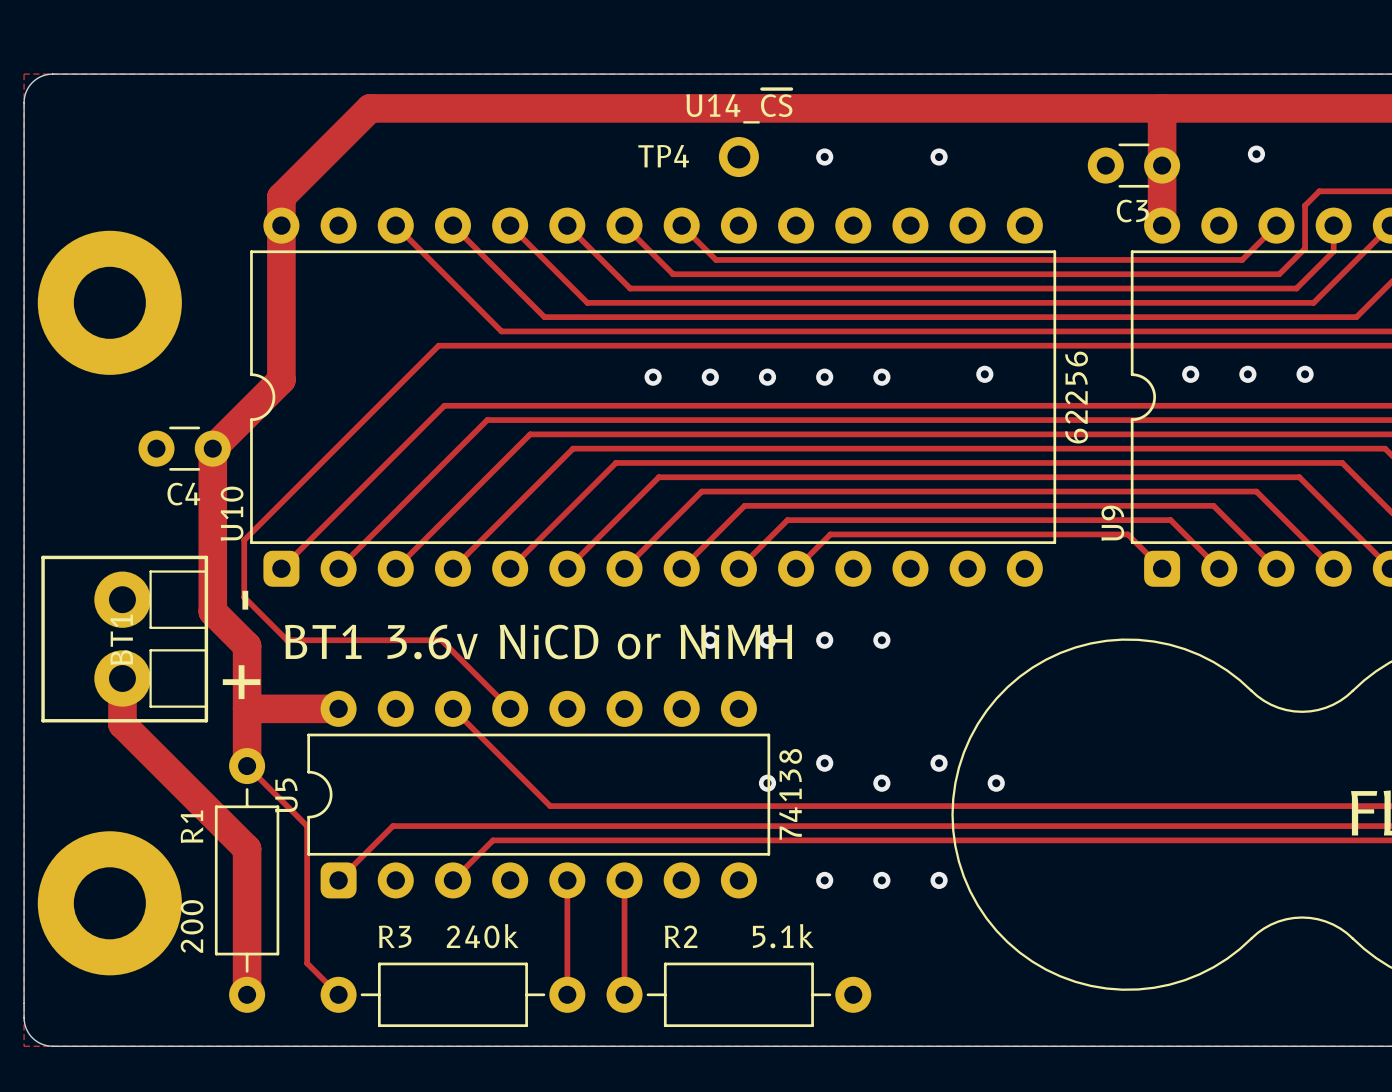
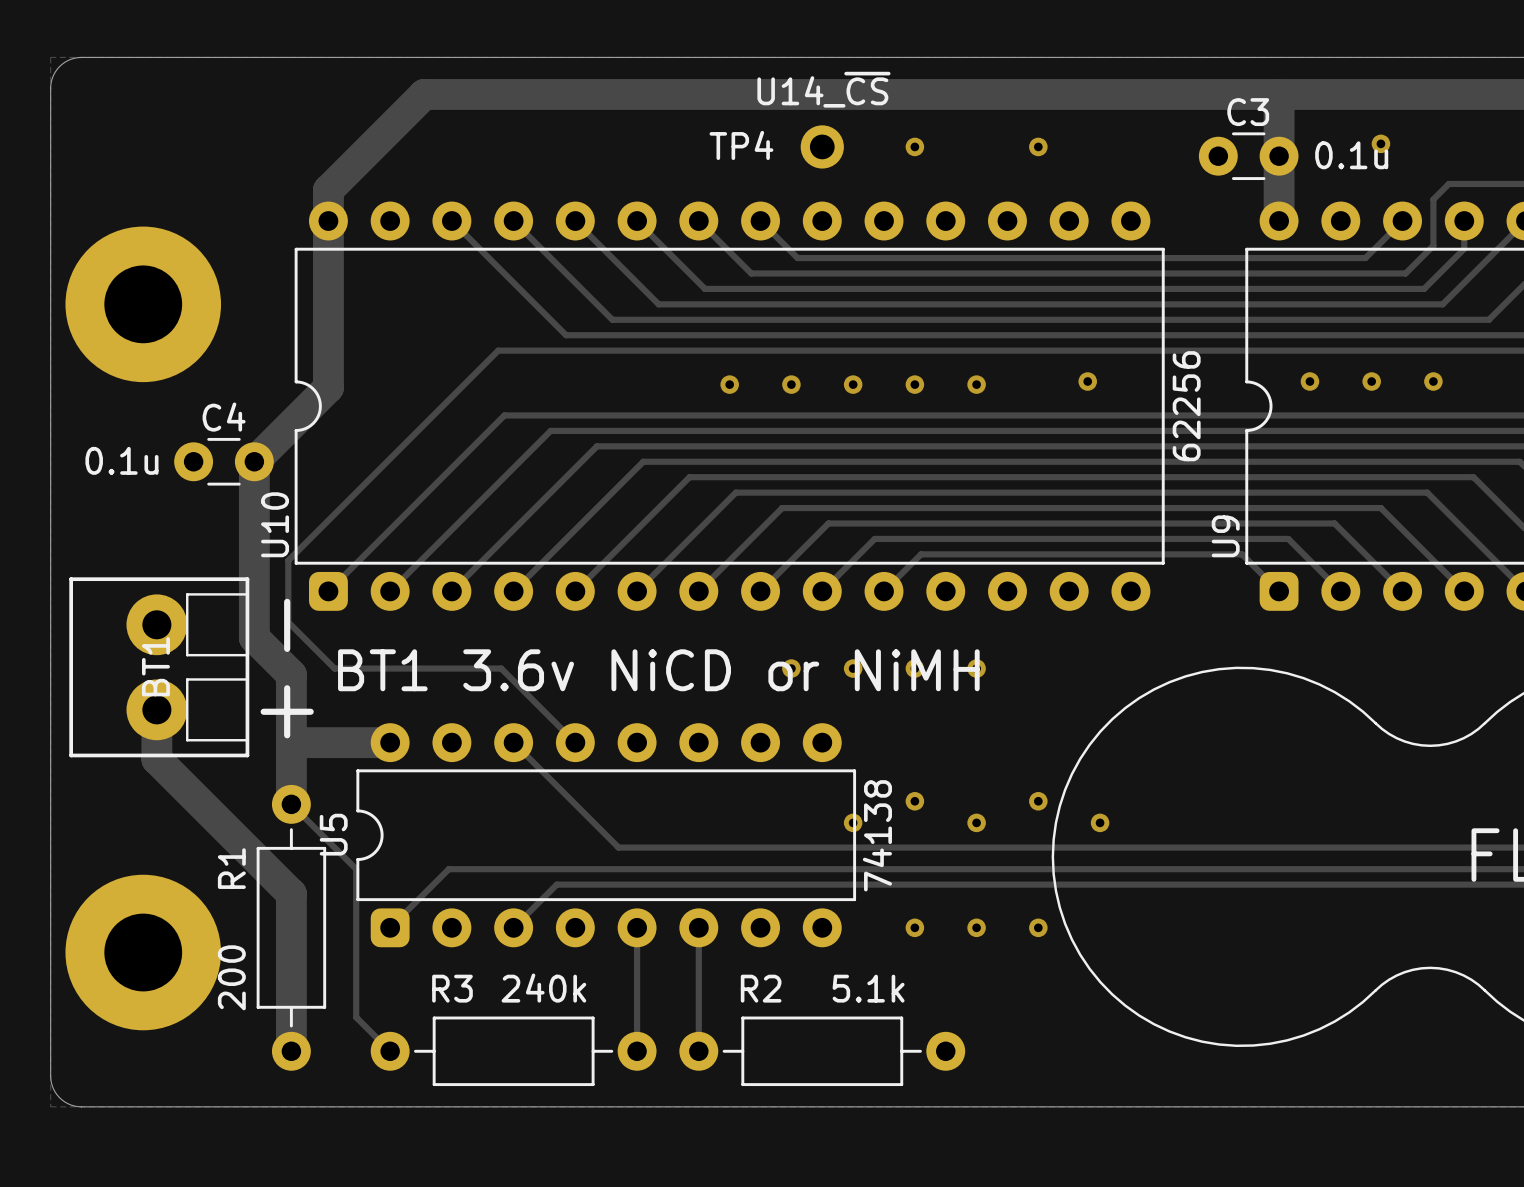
C3 value: none -> 0.1u (1351, 155)
C3 name position: C3 (1132, 211) -> C3 (1248, 112)
C4 value: none -> 0.1u (121, 460)
C4 name position: C4 (183, 494) -> C4 (224, 417)

